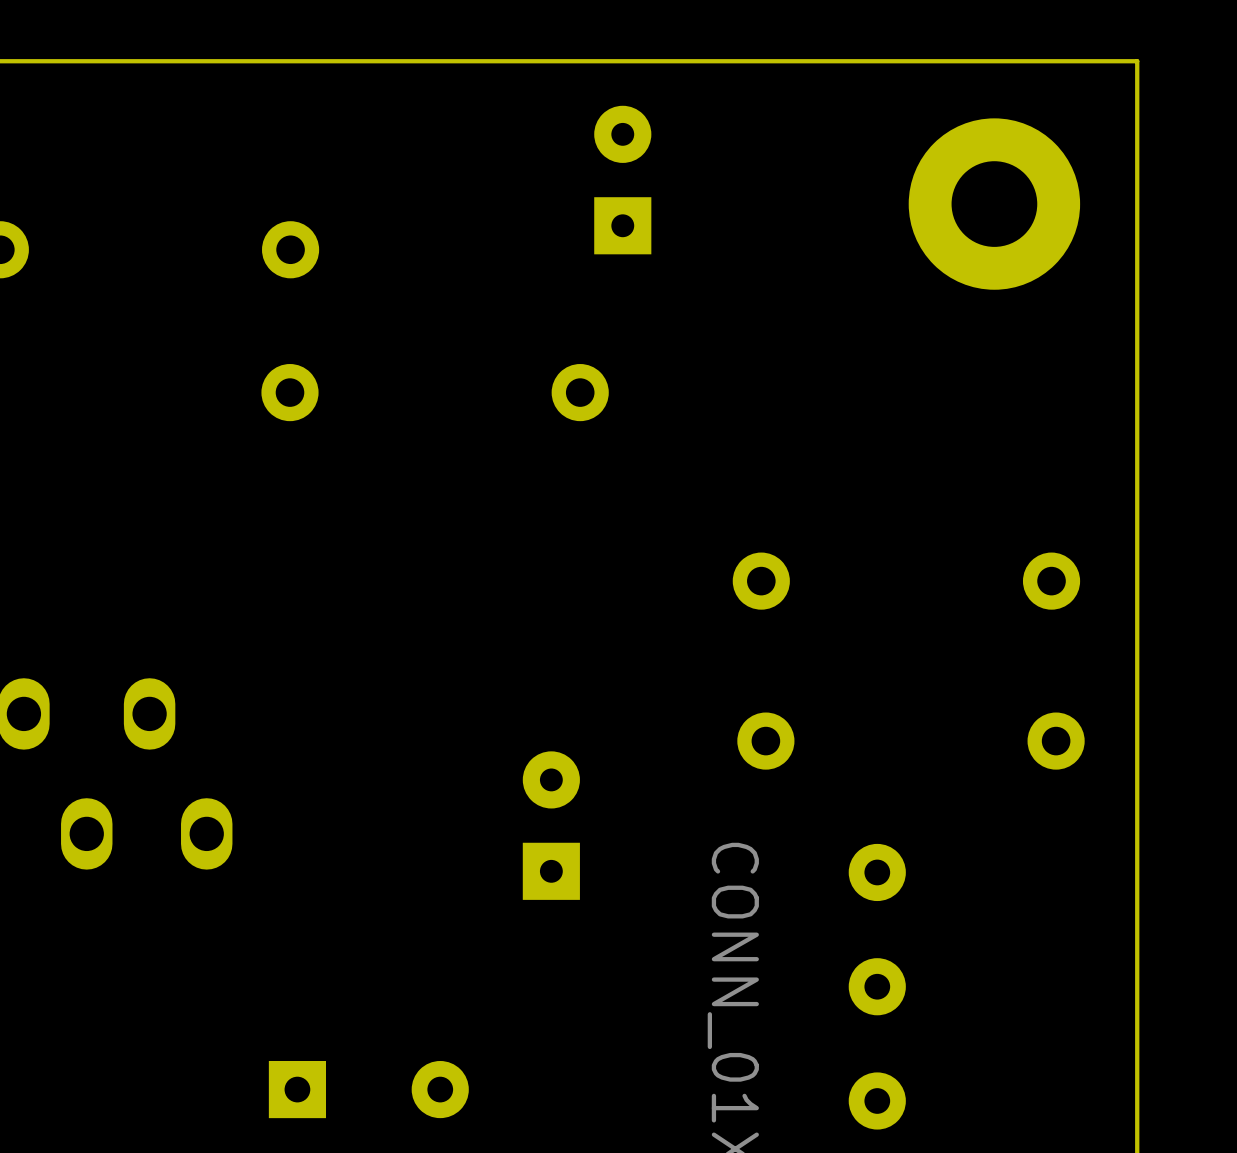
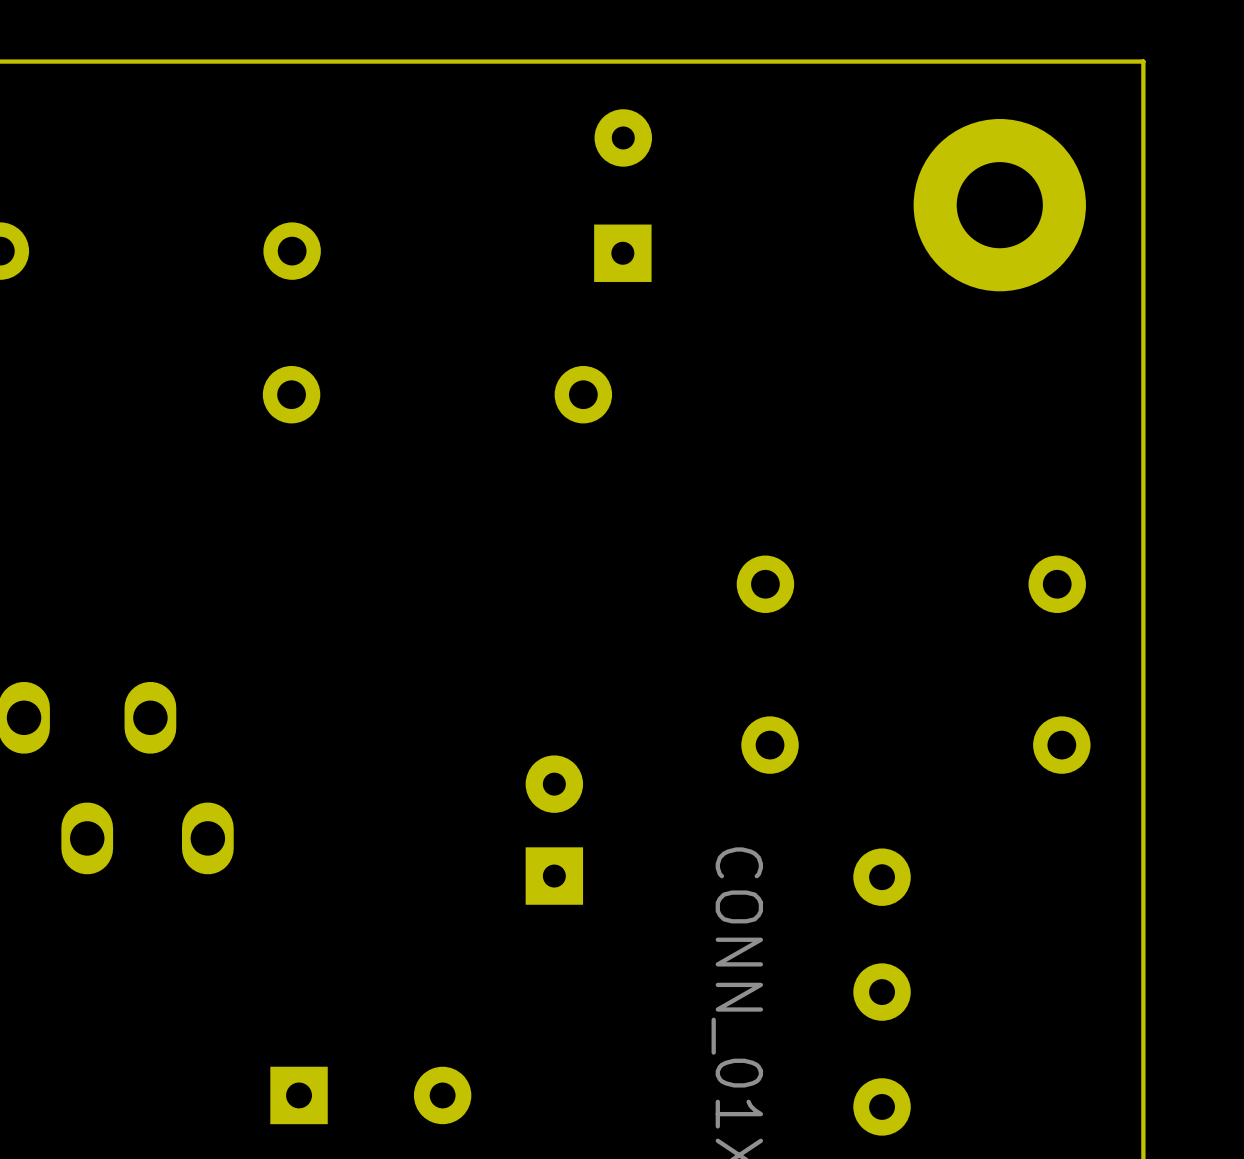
part footprint: [594, 105, 652, 255] -> [594, 109, 653, 282]

